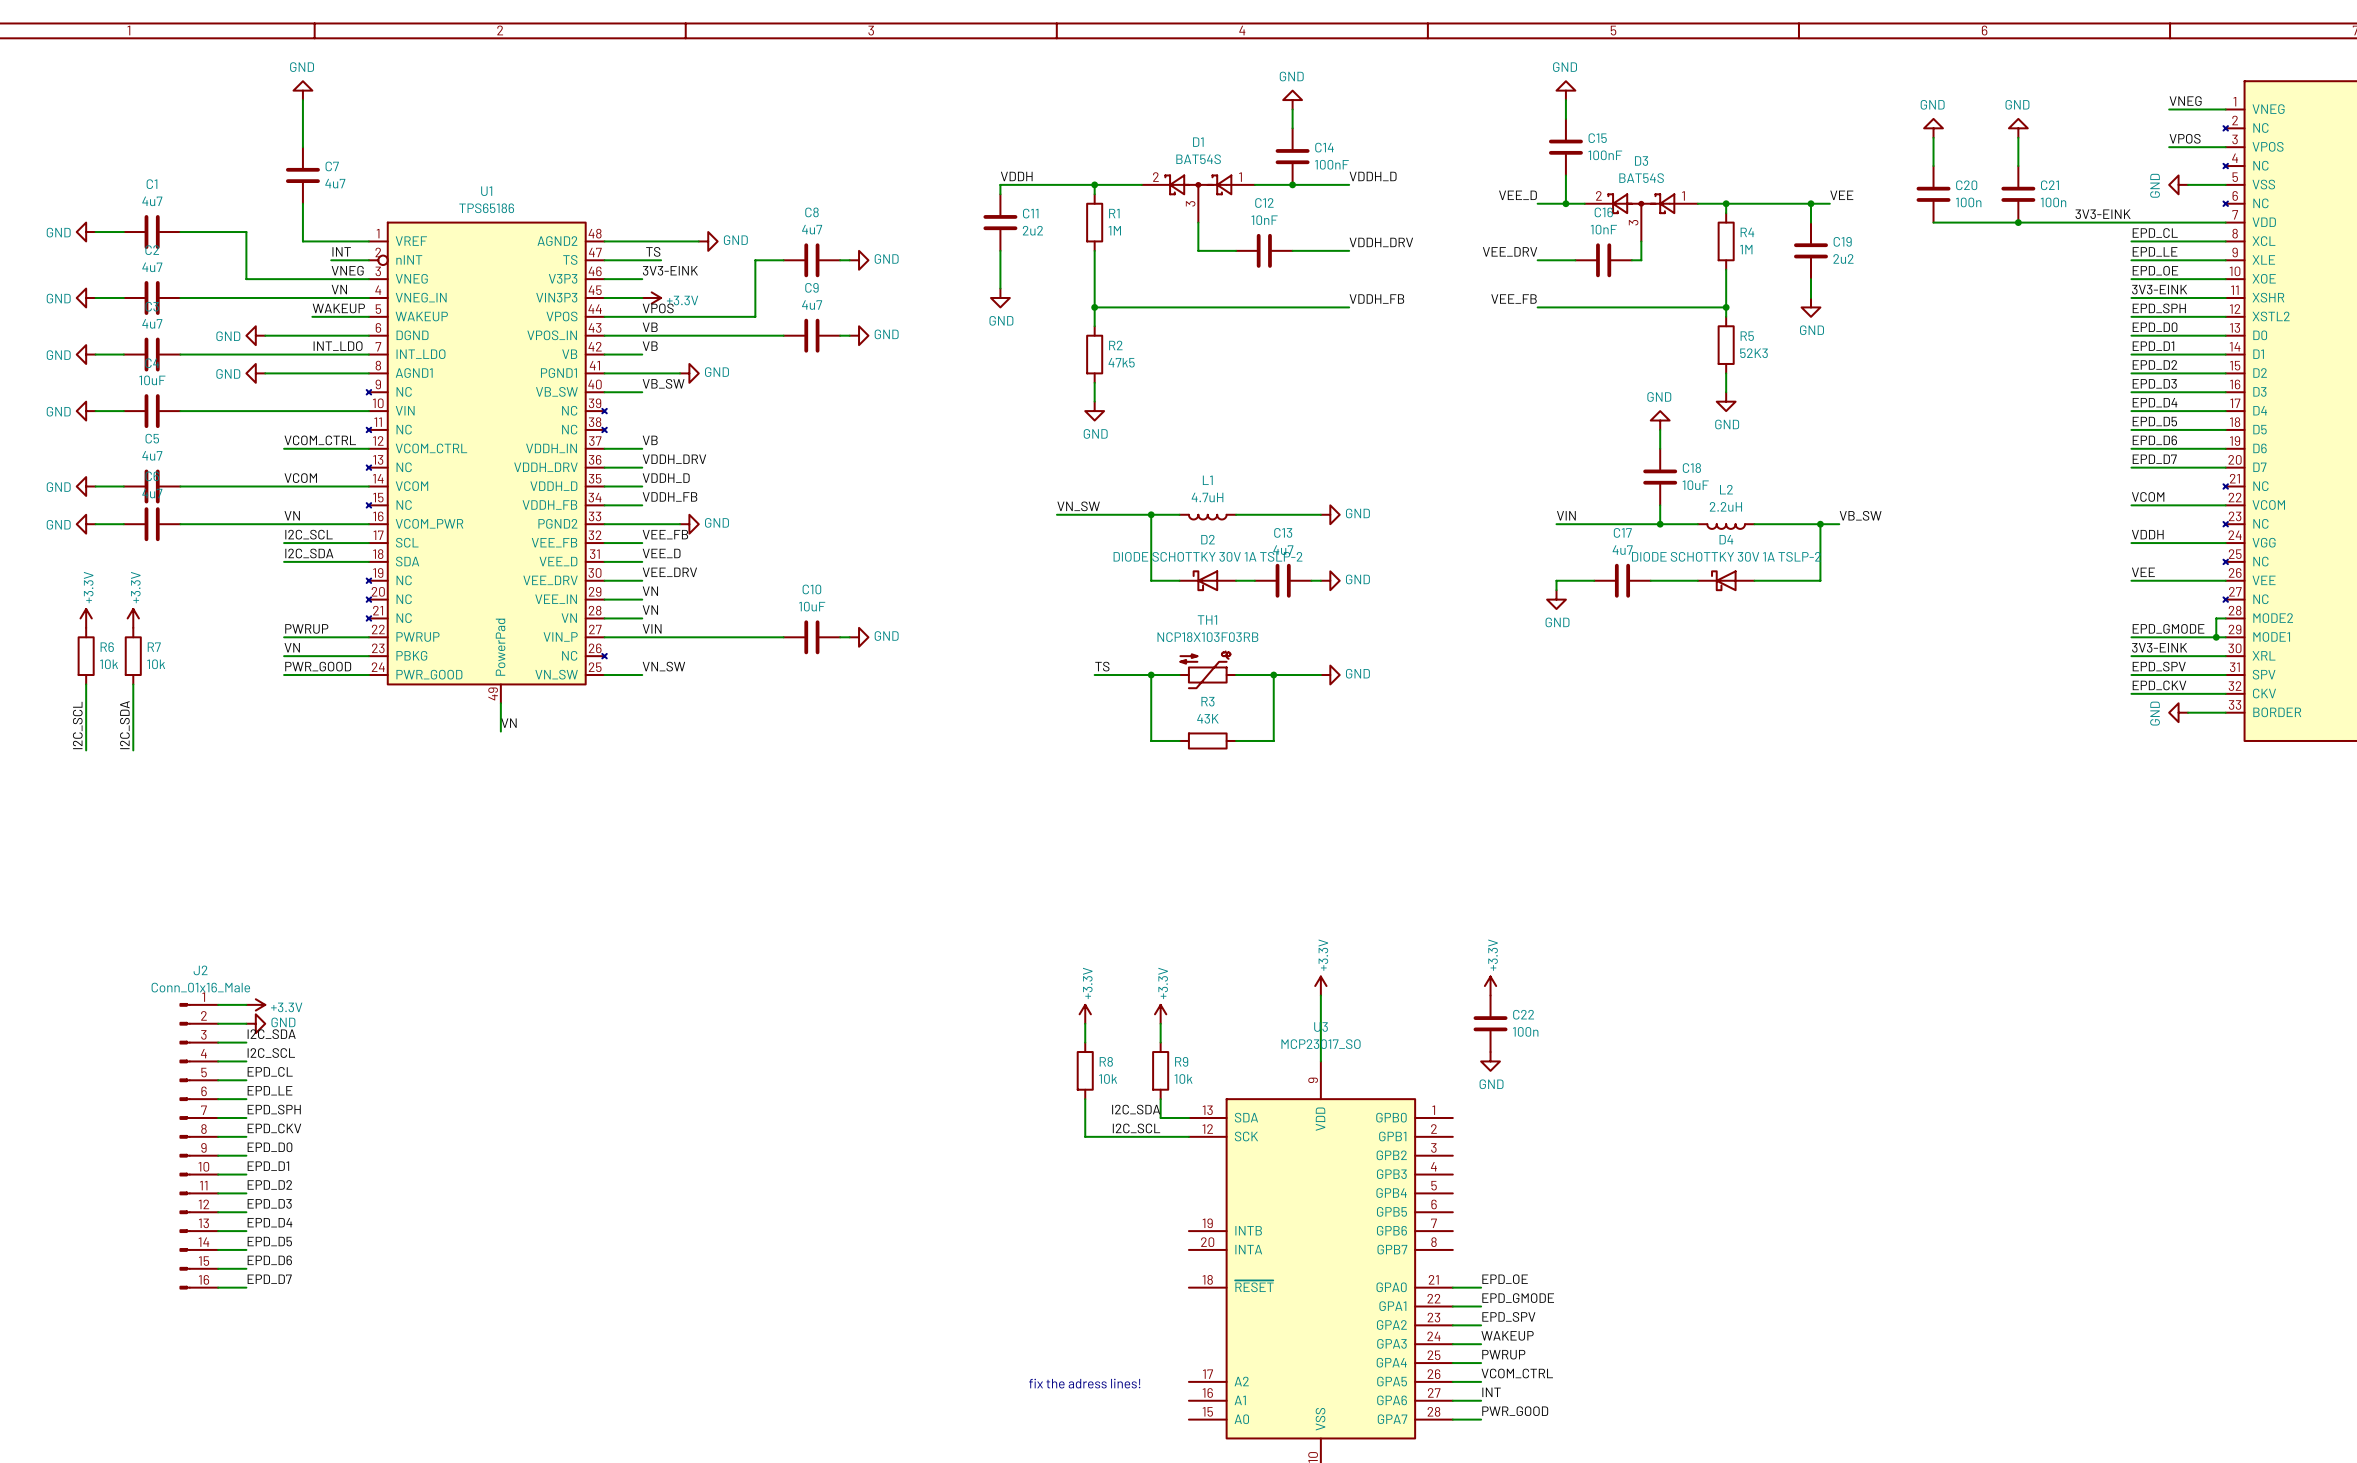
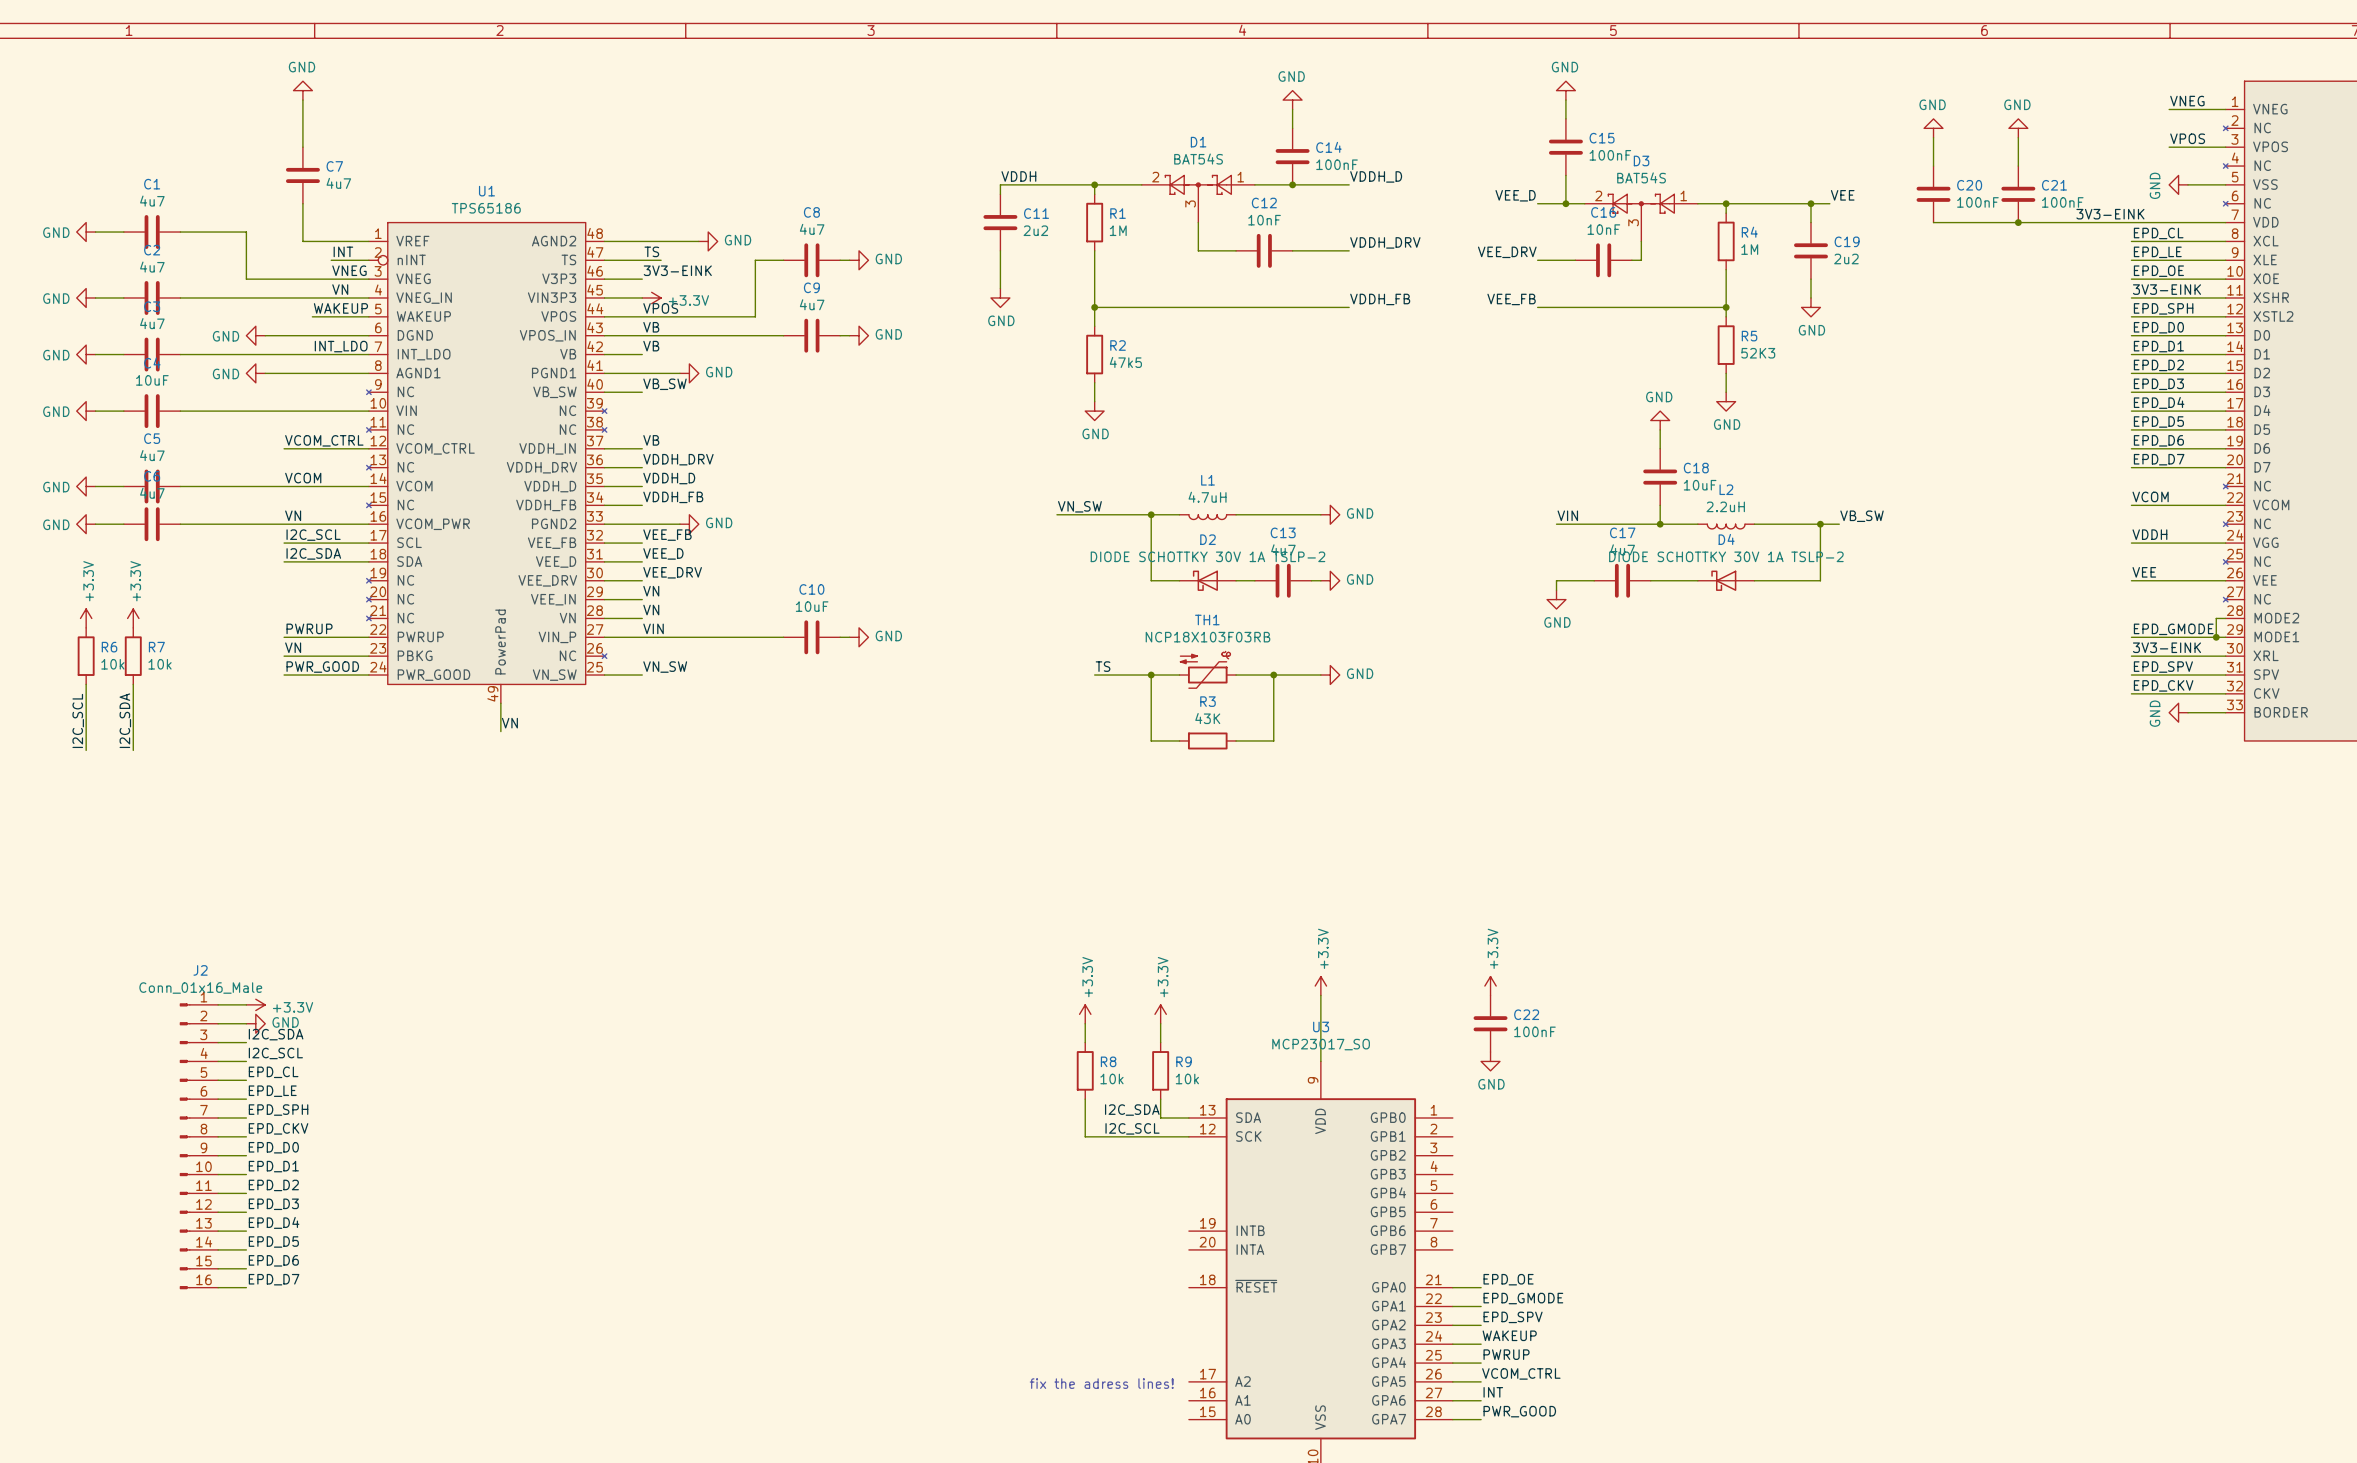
C20 value: 100n (1968, 202) -> 100nF (1977, 202)
C21 value: 100n (2053, 202) -> 100nF (2062, 202)
C22 value: 100n (1525, 1031) -> 100nF (1534, 1031)

